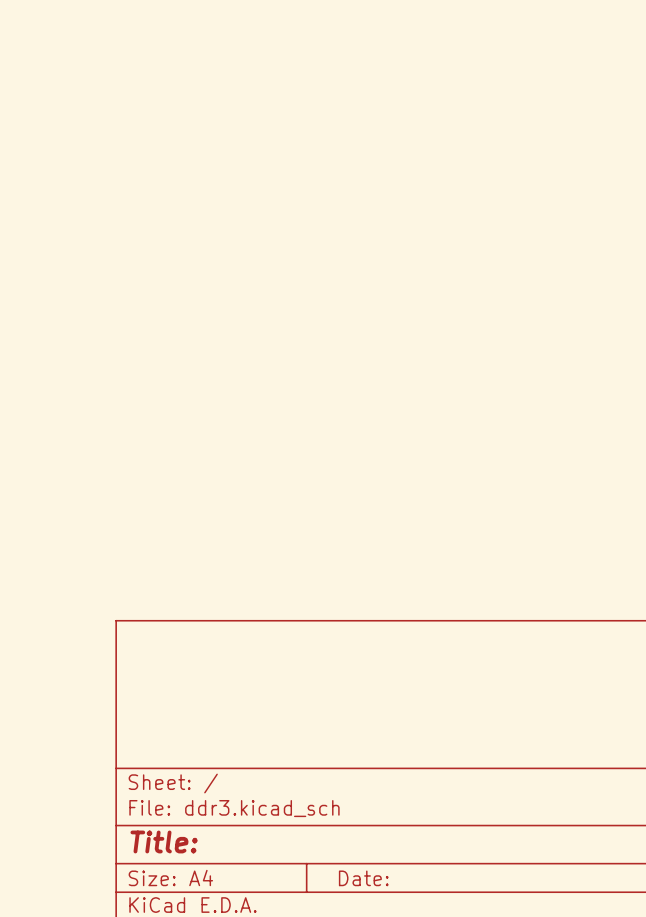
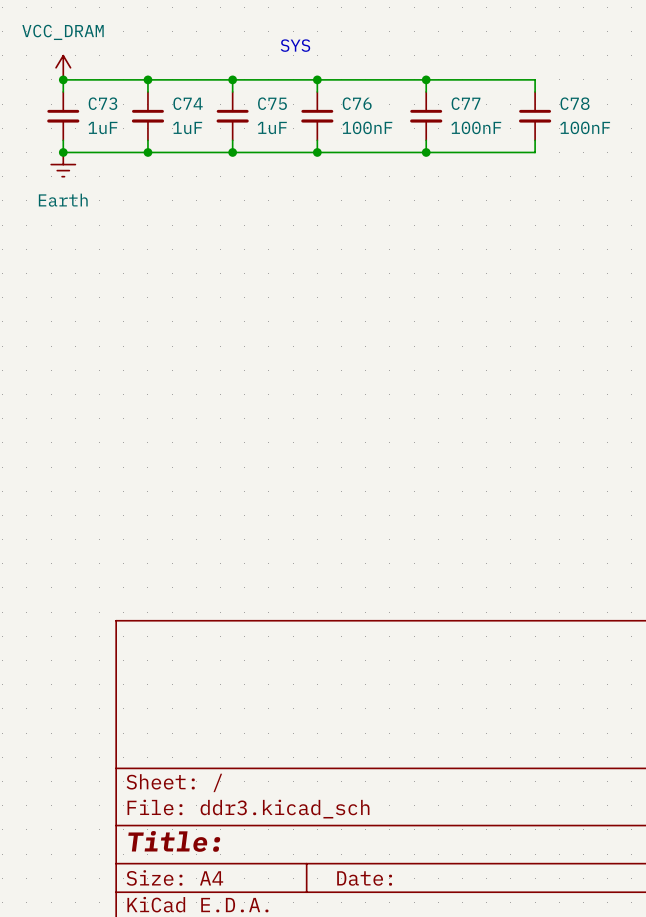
text: none -> SYS (295, 45)
power symbol: none -> VCC_DRAM (63, 67)
junction: none -> (63, 79)
wire: none -> (147, 79) (147, 91)
junction: none -> (147, 79)
wire: none -> (232, 79) (232, 91)
junction: none -> (232, 79)
wire: none -> (317, 79) (317, 91)
junction: none -> (317, 79)
wire: none -> (426, 79) (426, 91)
junction: none -> (426, 79)
wire: none -> (63, 91) (63, 79) (535, 79) (535, 91)
C73: none -> 1uF (63, 116)
C74: none -> 1uF (147, 116)
C75: none -> 1uF (232, 116)
C76: none -> 100nF (317, 116)
C77: none -> 100nF (426, 116)
C78: none -> 100nF (535, 116)
wire: none -> (63, 140) (63, 152) (535, 152) (535, 140)
wire: none -> (147, 140) (147, 152)
wire: none -> (232, 140) (232, 152)
wire: none -> (317, 140) (317, 152)
wire: none -> (426, 140) (426, 152)
junction: none -> (63, 152)
junction: none -> (147, 152)
junction: none -> (232, 152)
junction: none -> (317, 152)
junction: none -> (426, 152)
power symbol: none -> Earth (63, 164)

